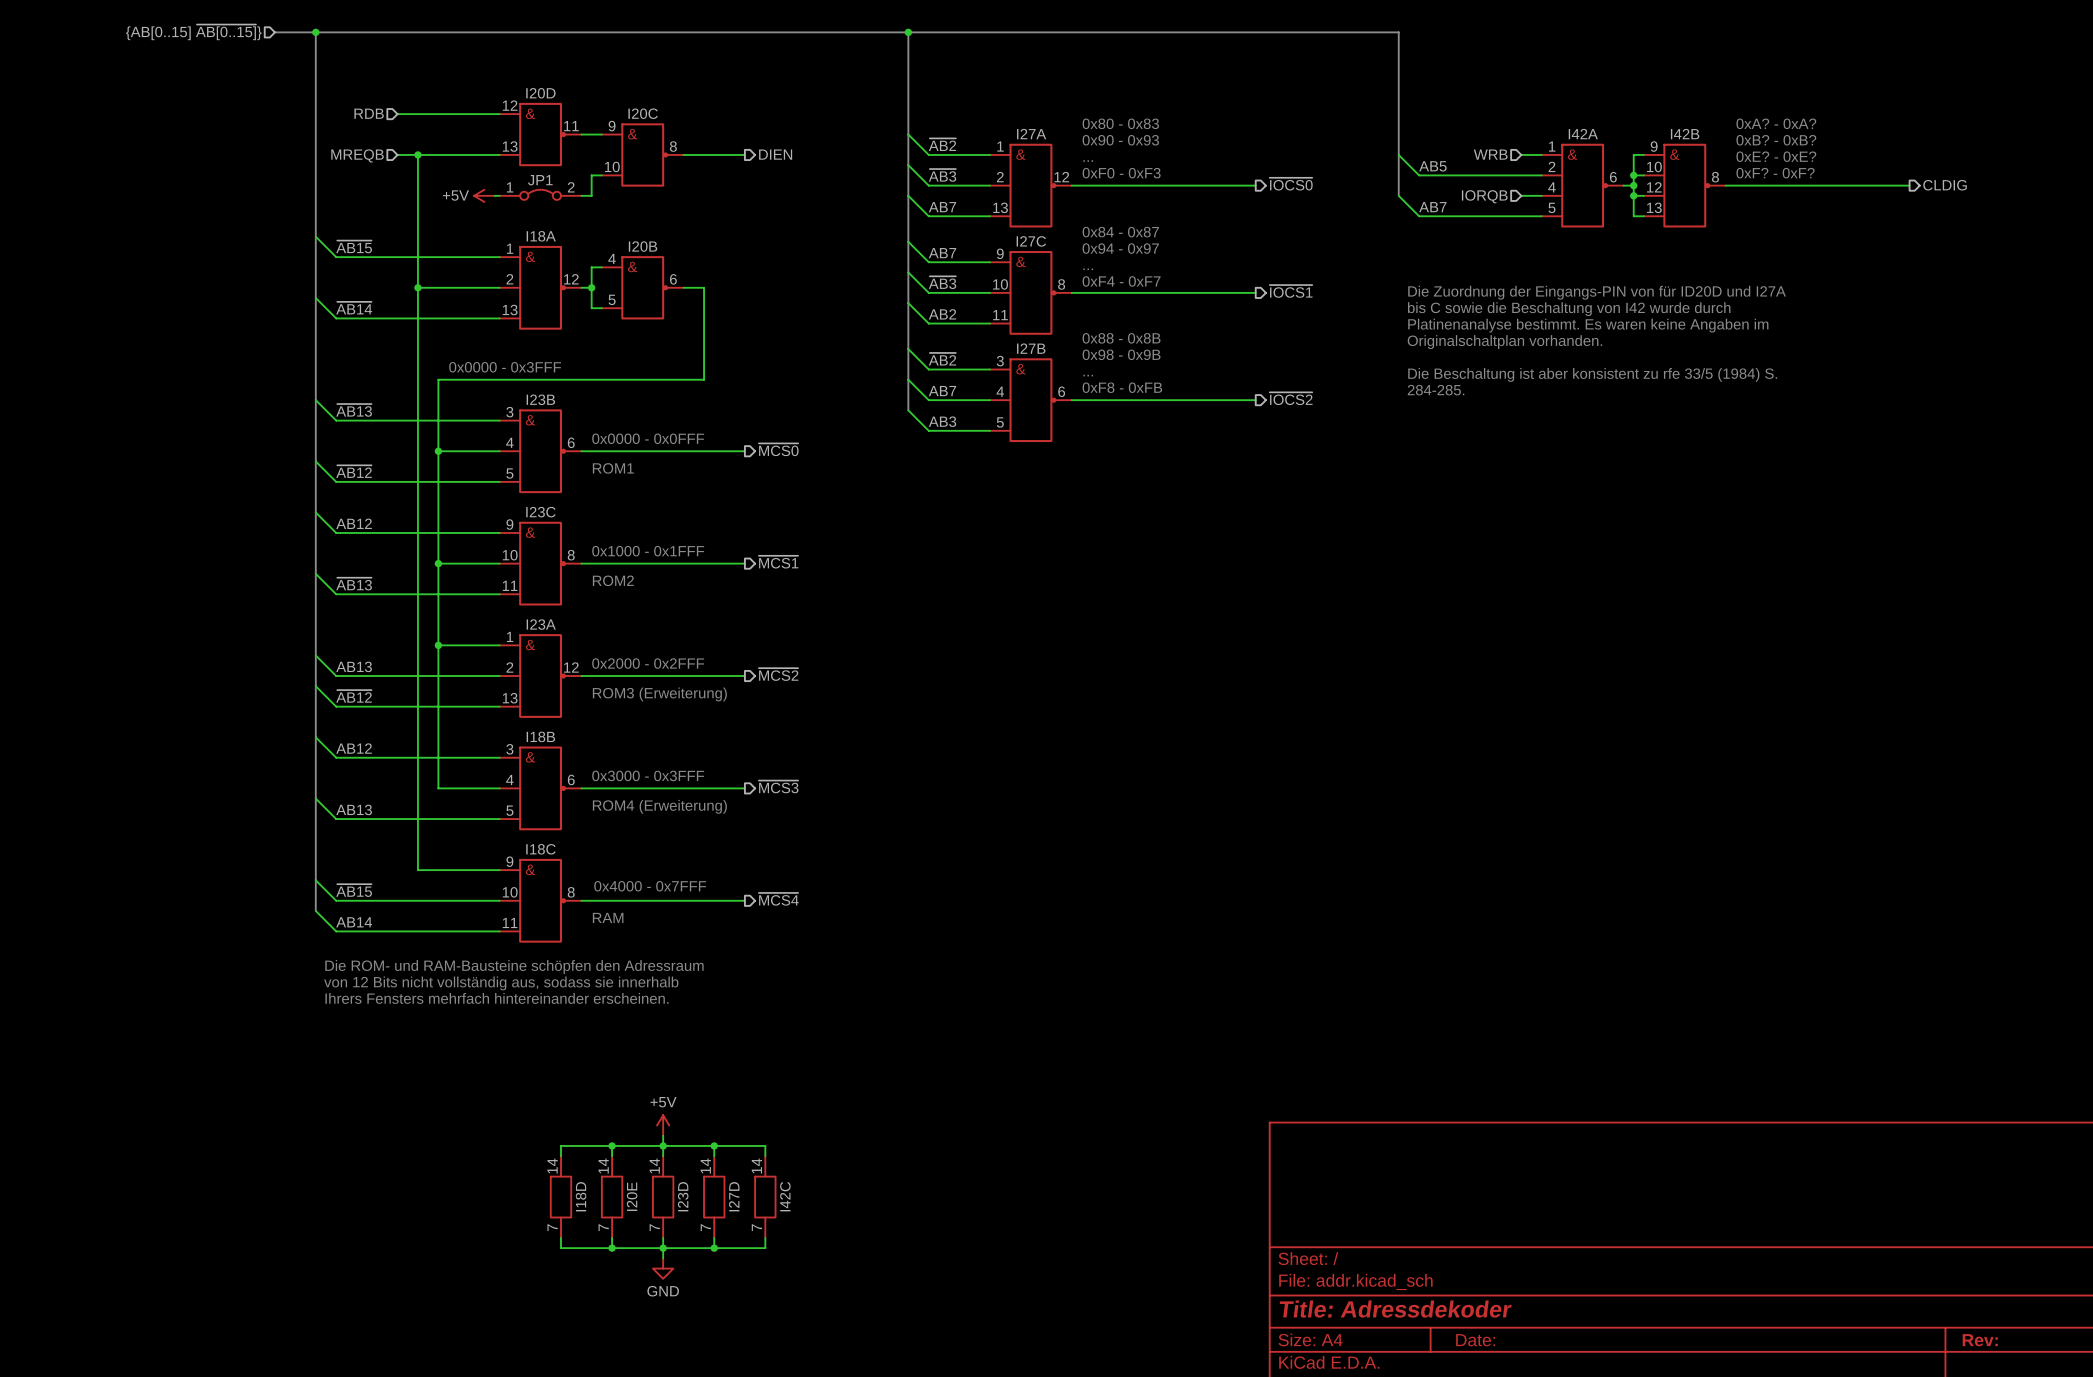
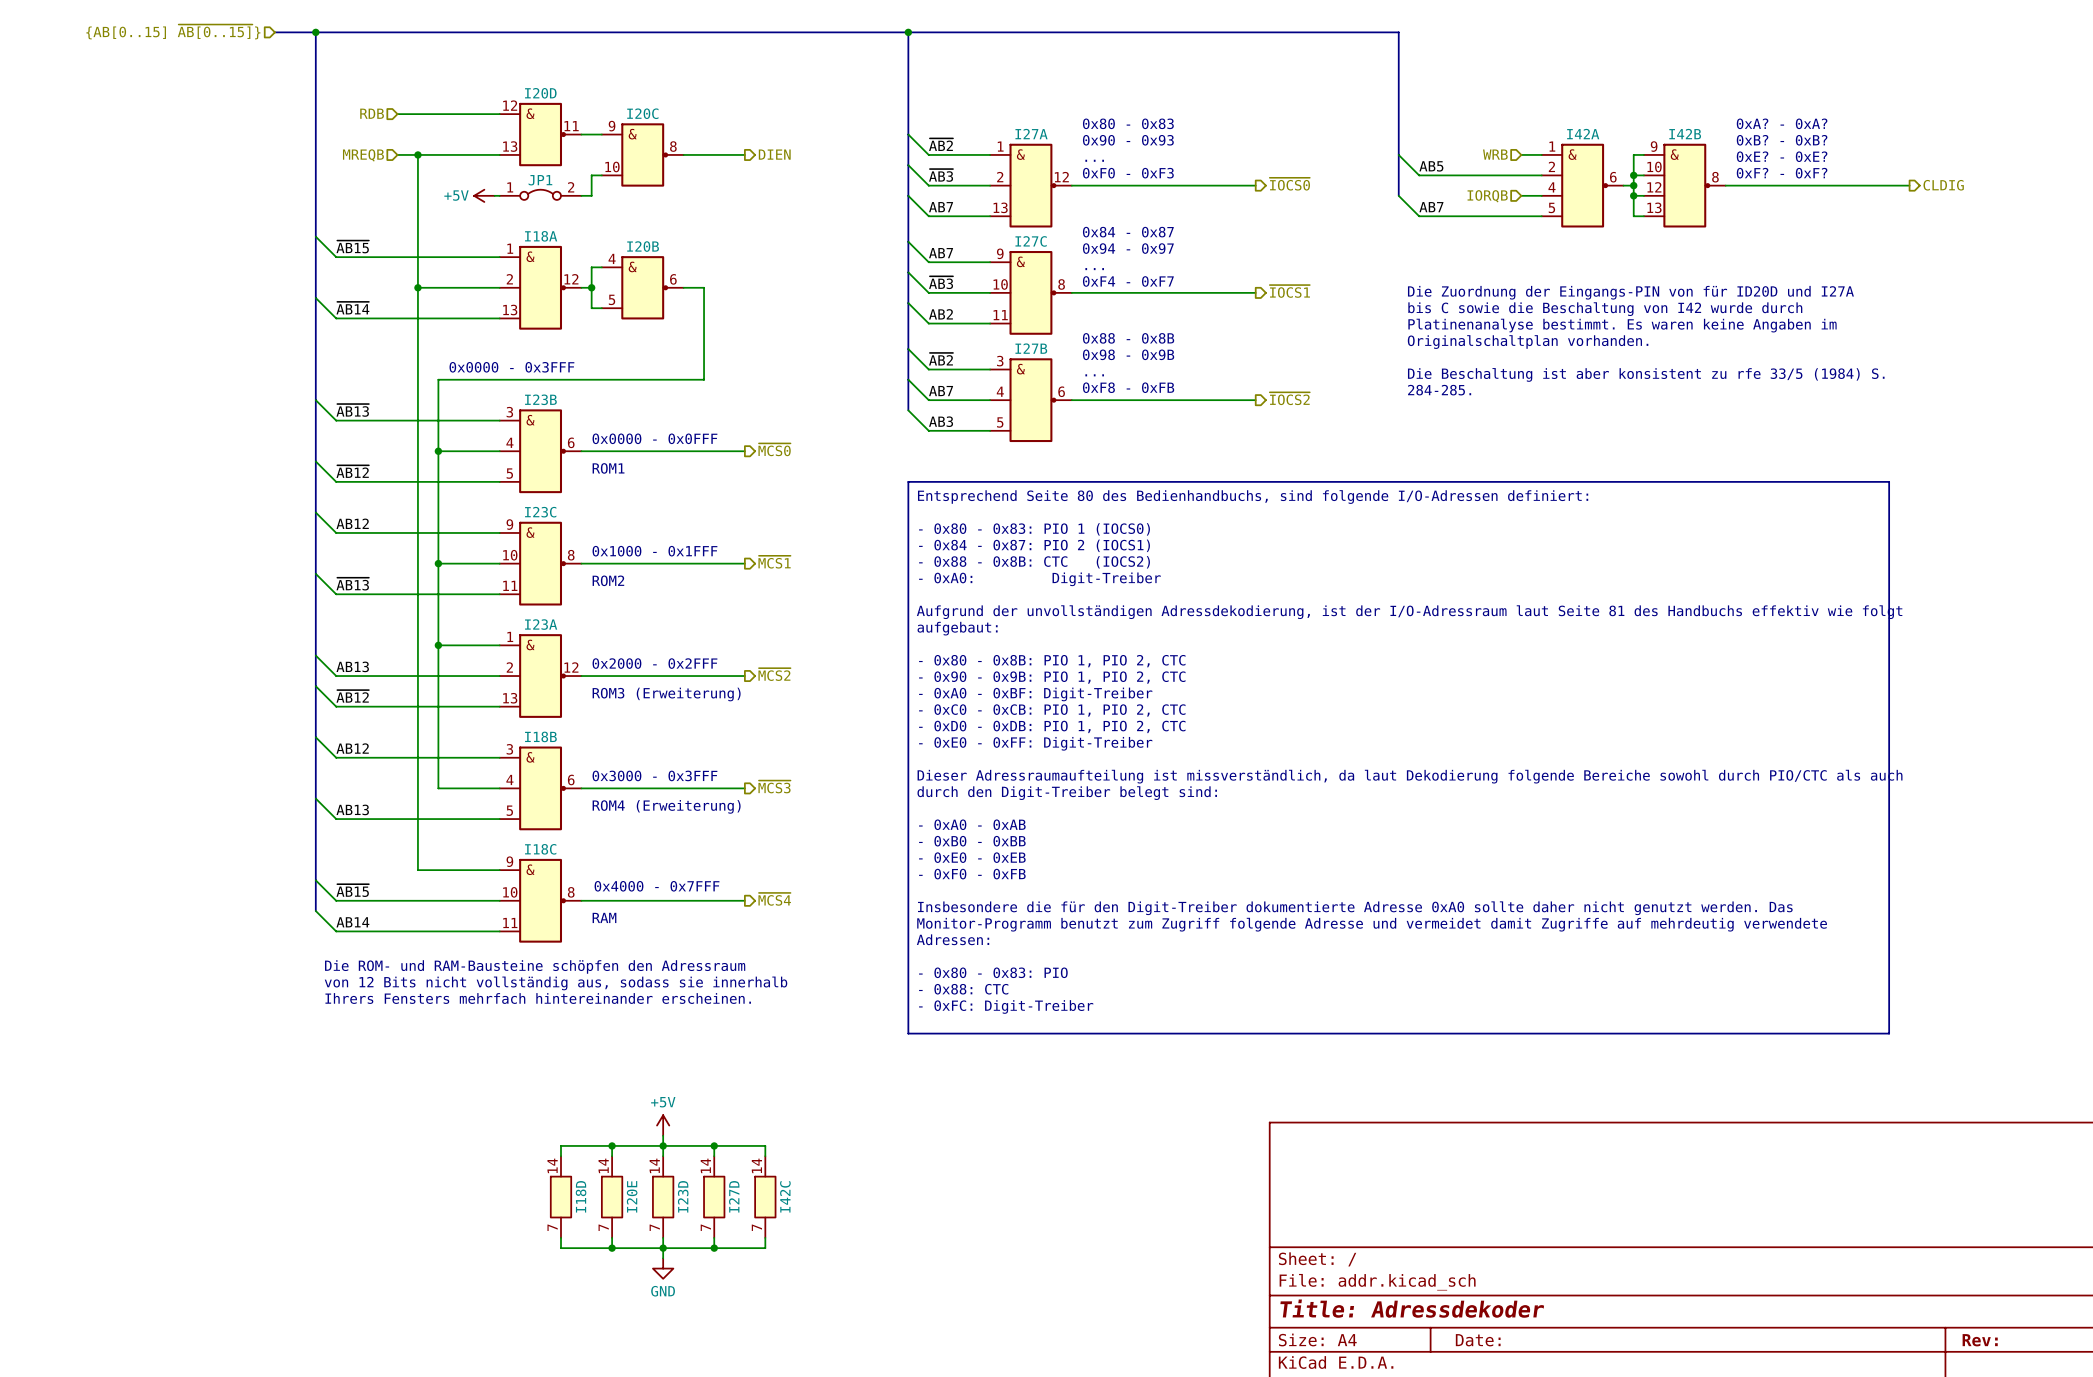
line: none -> (908, 481) (1889, 481) (1889, 1033) (908, 1033) (908, 481)
text: none -> Entsprechend Seite 80 des Bedienhandbuchs, sind folgende I/O-Adressen definiert: (1253, 497)
text: none -> - 0x80 - 0x83: PIO 1 (IOCS0) (1034, 529)
text: none -> - 0x84 - 0x87: PIO 2 (IOCS1) (1034, 545)
text: none -> - 0x88 - 0x8B: CTC (IOCS2) (1034, 562)
text: none -> - 0xA0: Digit-Treiber (1039, 579)
text: none -> Aufgrund der unvollständigen Adressdekodierung, ist der I/O-Adressraum laut Seite 81 des Handbuchs effektiv wie folgt (1409, 612)
text: none -> aufgebaut: (957, 628)
text: none -> - 0x80 - 0x8B: PIO 1, PIO 2, CTC (1052, 661)
text: none -> - 0x90 - 0x9B: PIO 1, PIO 2, CTC (1052, 677)
text: none -> - 0xA0 - 0xBF: Digit-Treiber (1035, 694)
text: none -> - 0xC0 - 0xCB: PIO 1, PIO 2, CTC (1052, 710)
text: none -> - 0xD0 - 0xDB: PIO 1, PIO 2, CTC (1052, 726)
text: none -> - 0xE0 - 0xFF: Digit-Treiber (1035, 743)
text: none -> Dieser Adressraumaufteilung ist missverständlich, da laut Dekodierung folgende Bereiche sowohl durch PIO/CTC als auch (1410, 776)
text: none -> durch den Digit-Treiber belegt sind: (1067, 793)
text: none -> - 0xA0 - 0xAB (972, 824)
text: none -> - 0xB0 - 0xBB (972, 841)
text: none -> - 0xE0 - 0xEB (972, 857)
text: none -> - 0xF0 - 0xFB (972, 874)
text: none -> Insbesondere die für den Digit-Treiber dokumentierte Adresse 0xA0 sollte daher nicht genutzt werden. Das (1355, 908)
text: none -> Monitor-Programm benutzt zum Zugriff folgende Adresse und vermeidet damit Zugriffe auf mehrdeutig verwendete (1372, 924)
text: none -> Adressen: (953, 939)
text: none -> - 0x80 - 0x83: PIO (993, 972)
text: none -> - 0x88: CTC (963, 989)
text: none -> - 0xFC: Digit-Treiber (1006, 1006)

